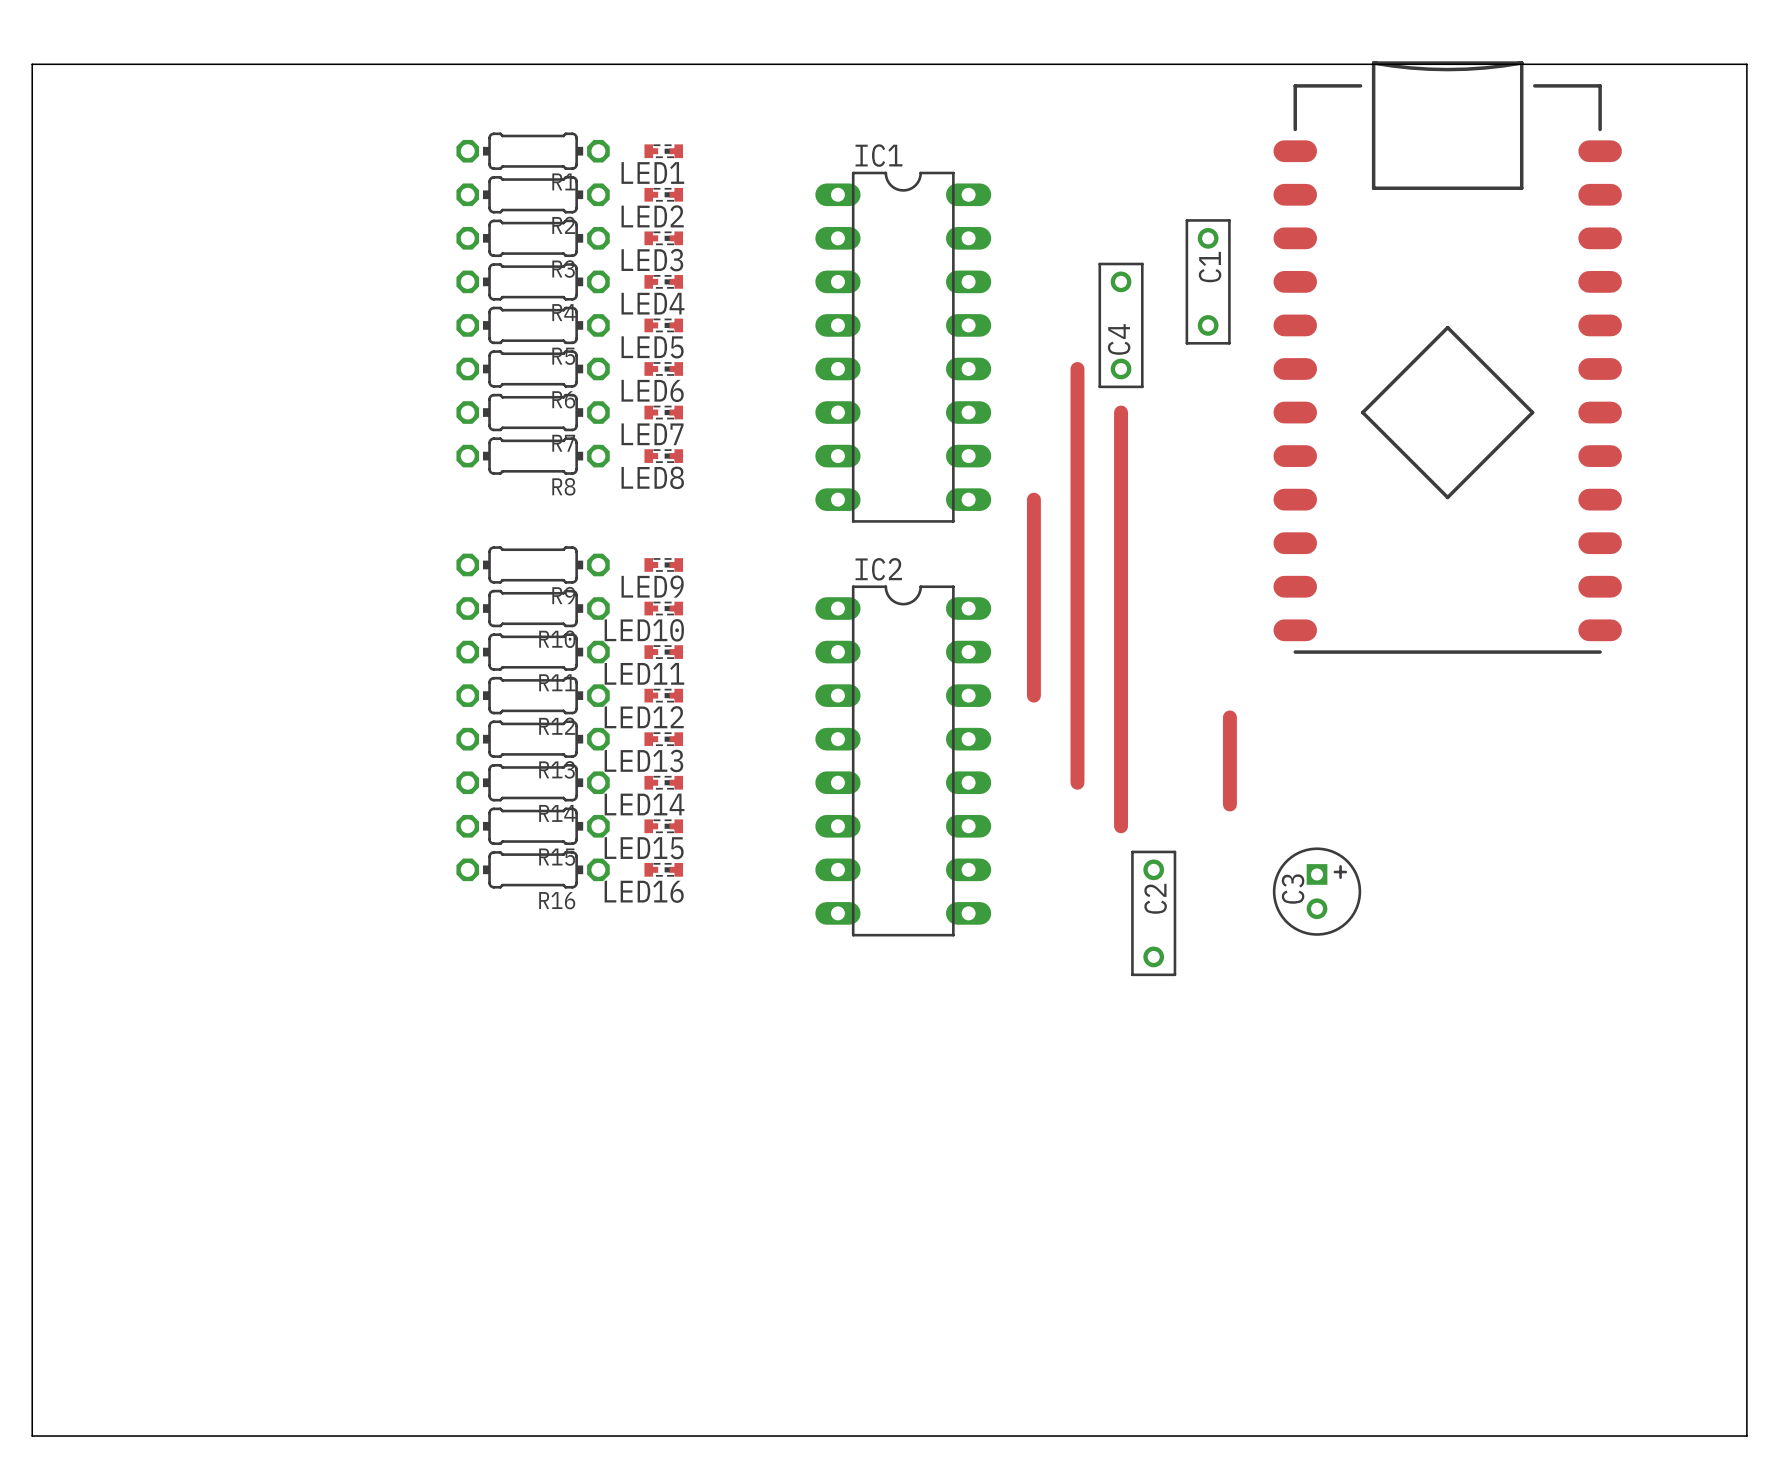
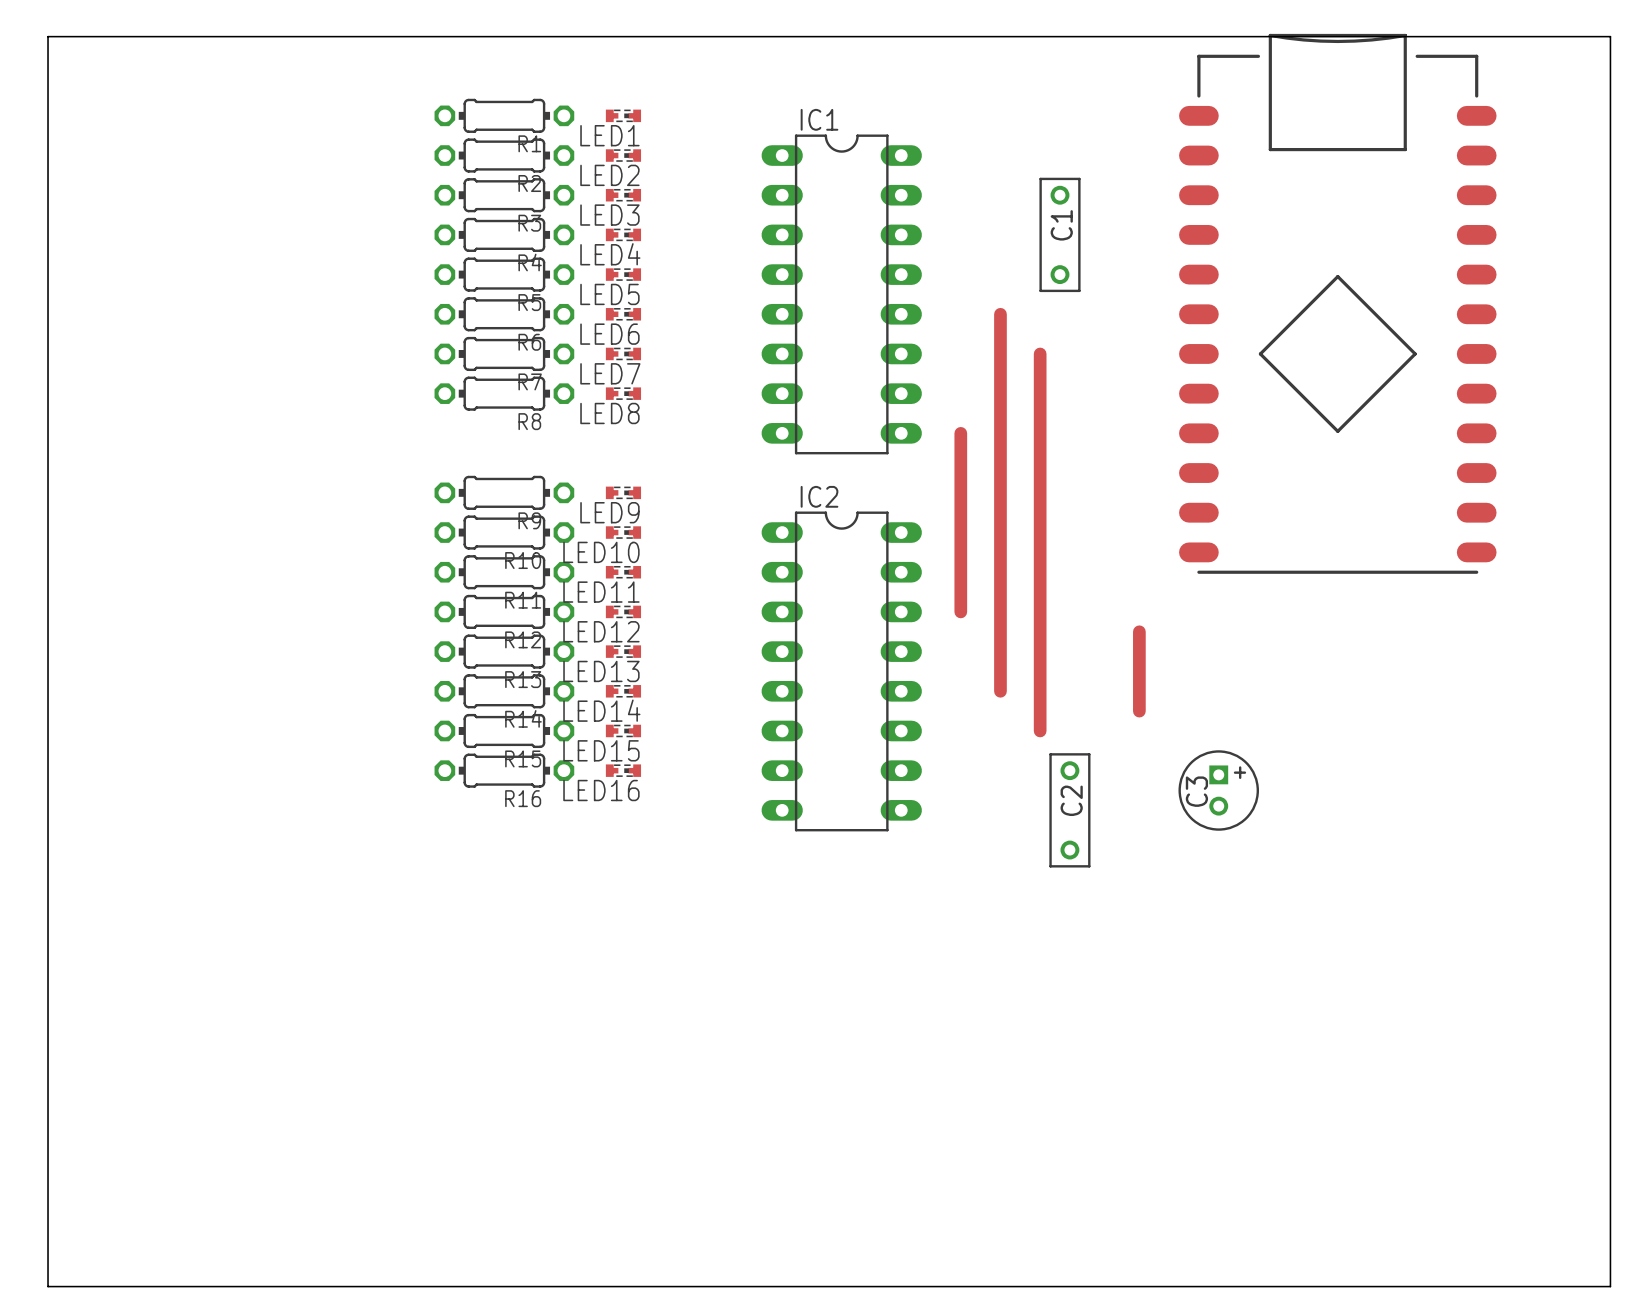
C1 position: (1208, 281) -> (1060, 234)
C4: (1121, 325) -> none

